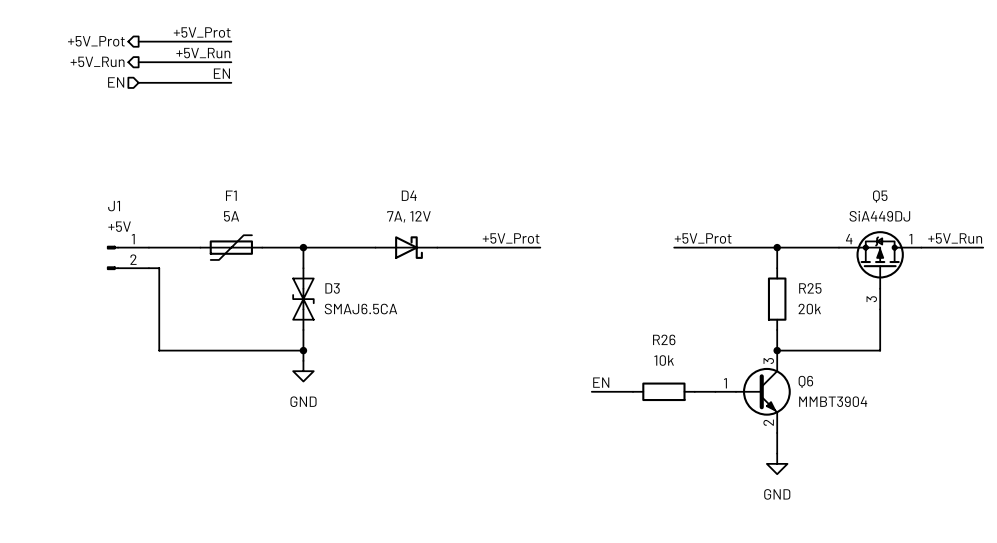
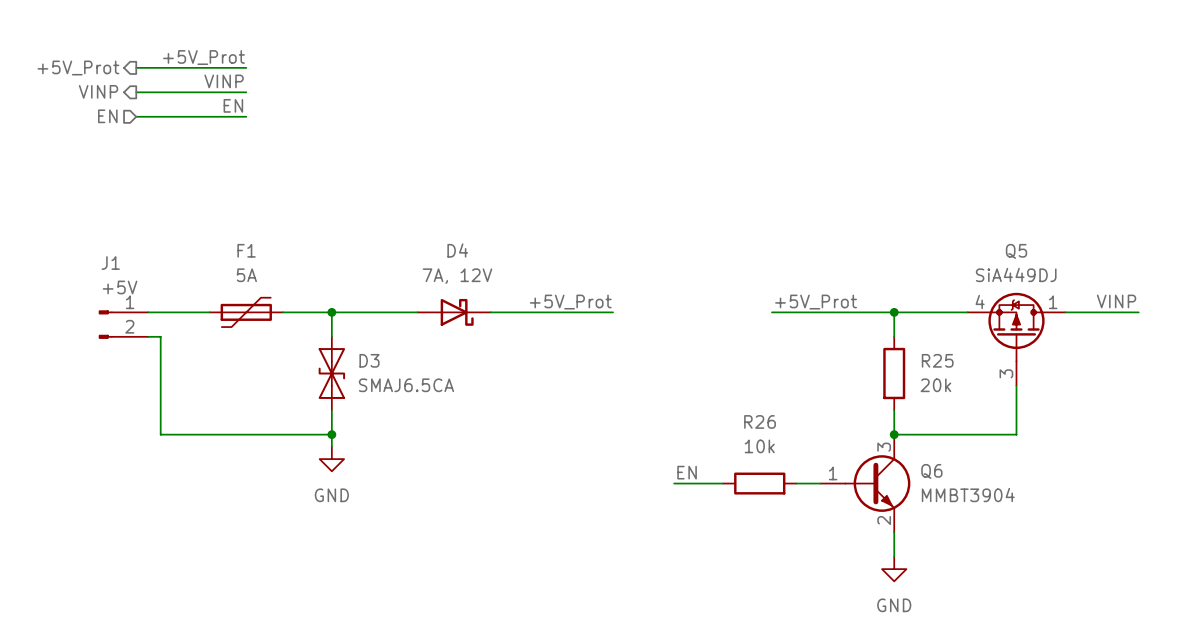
label: +5V_Run (203, 53) -> VINP (224, 81)
hierarchical label: +5V_Run (97, 61) -> VINP (98, 91)
label: +5V_Run (955, 238) -> VINP (1116, 301)

